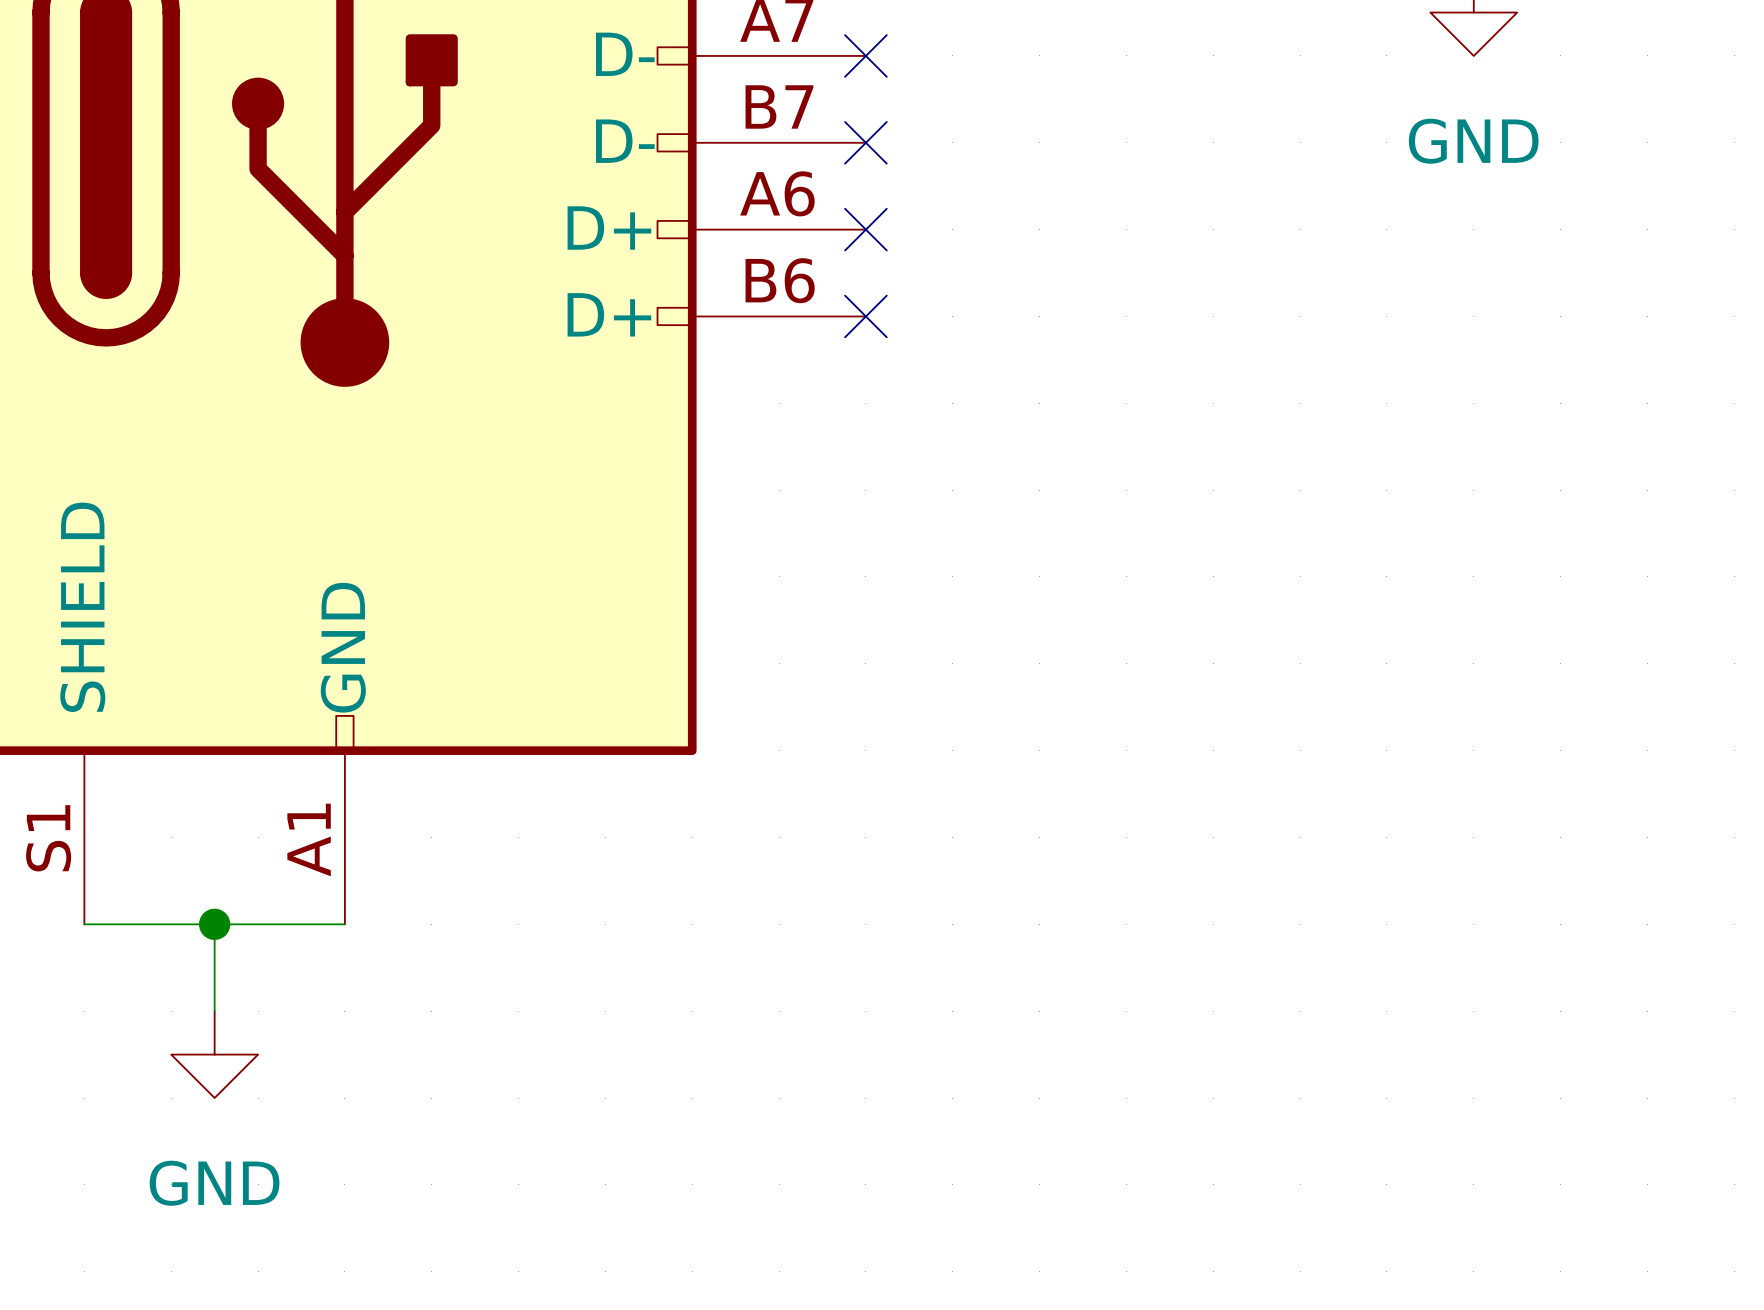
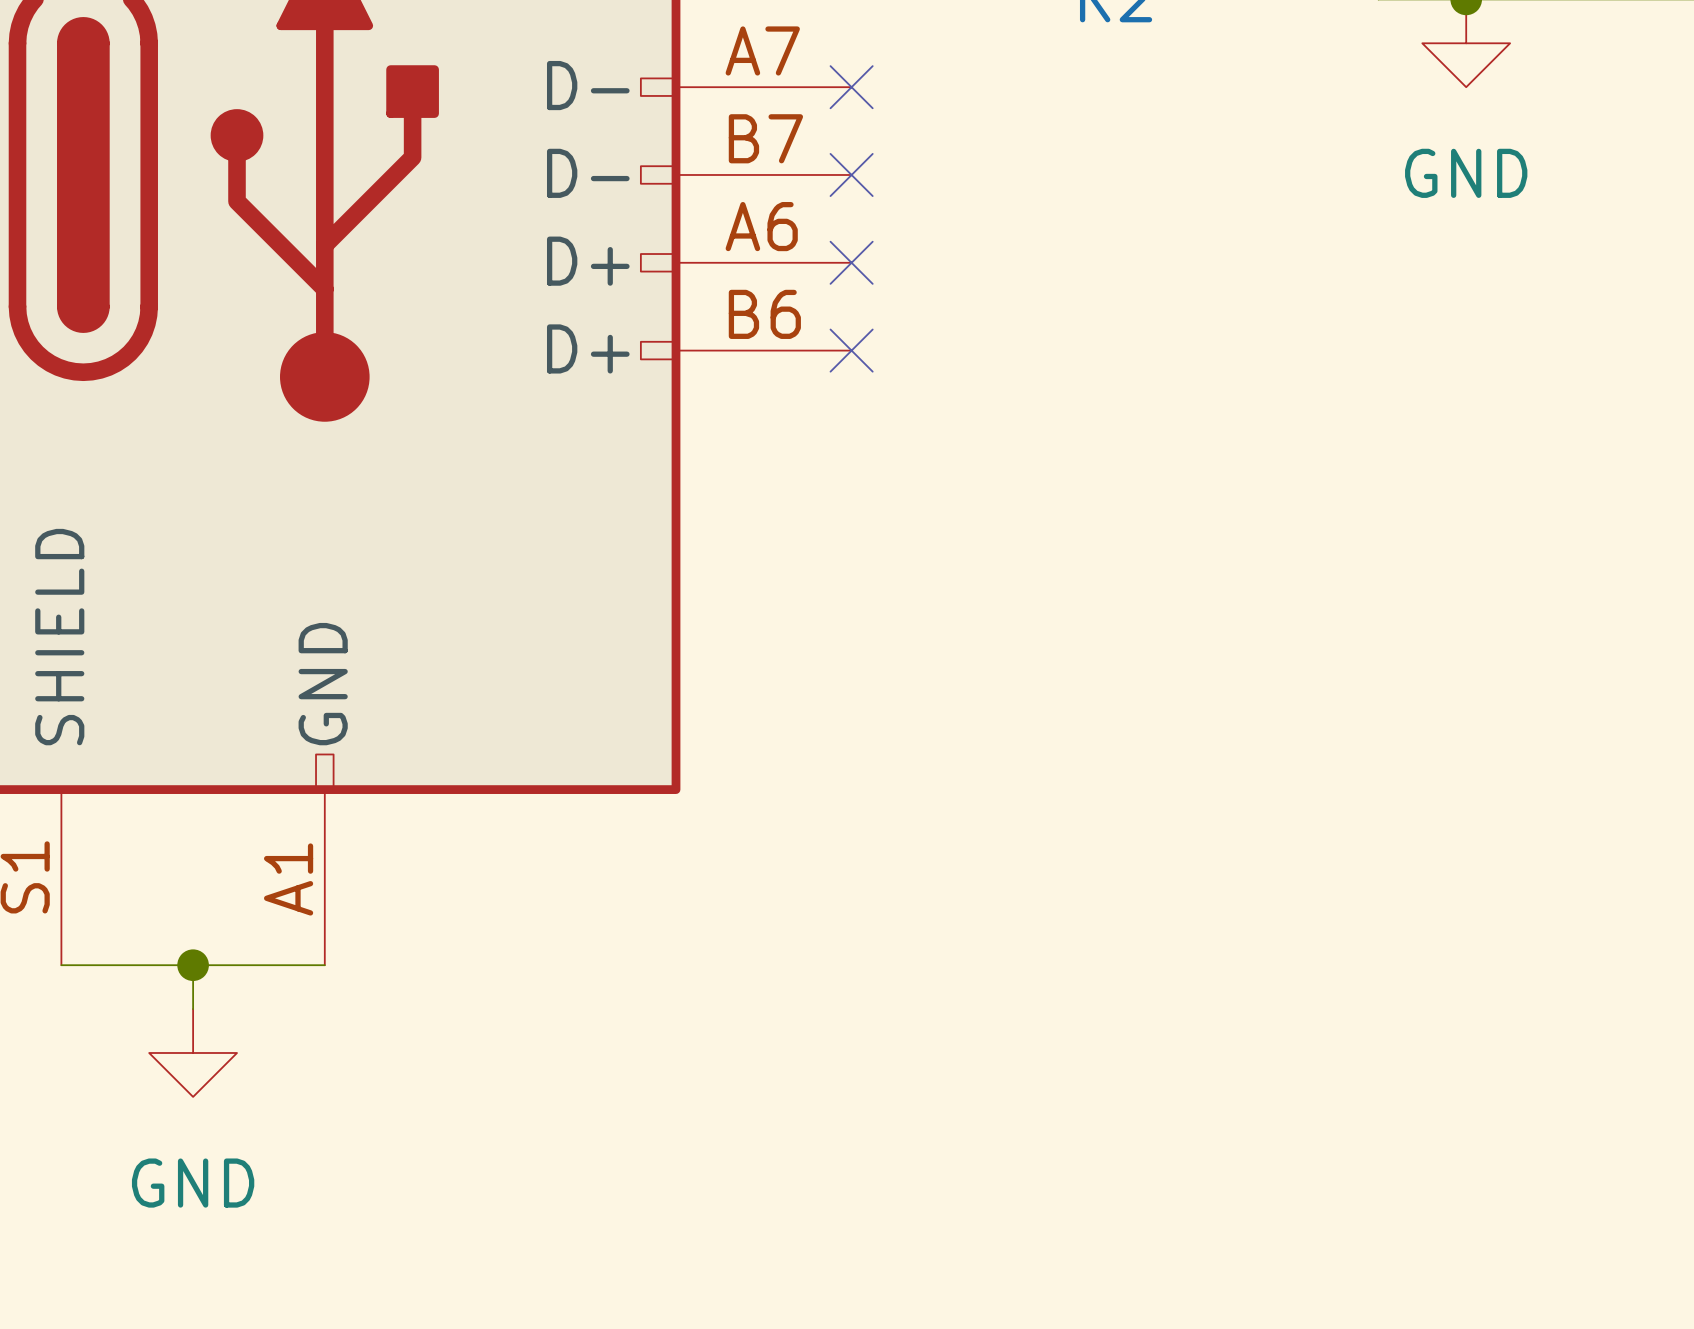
power symbol position: GND (214, 1054) -> GND (193, 1052)

